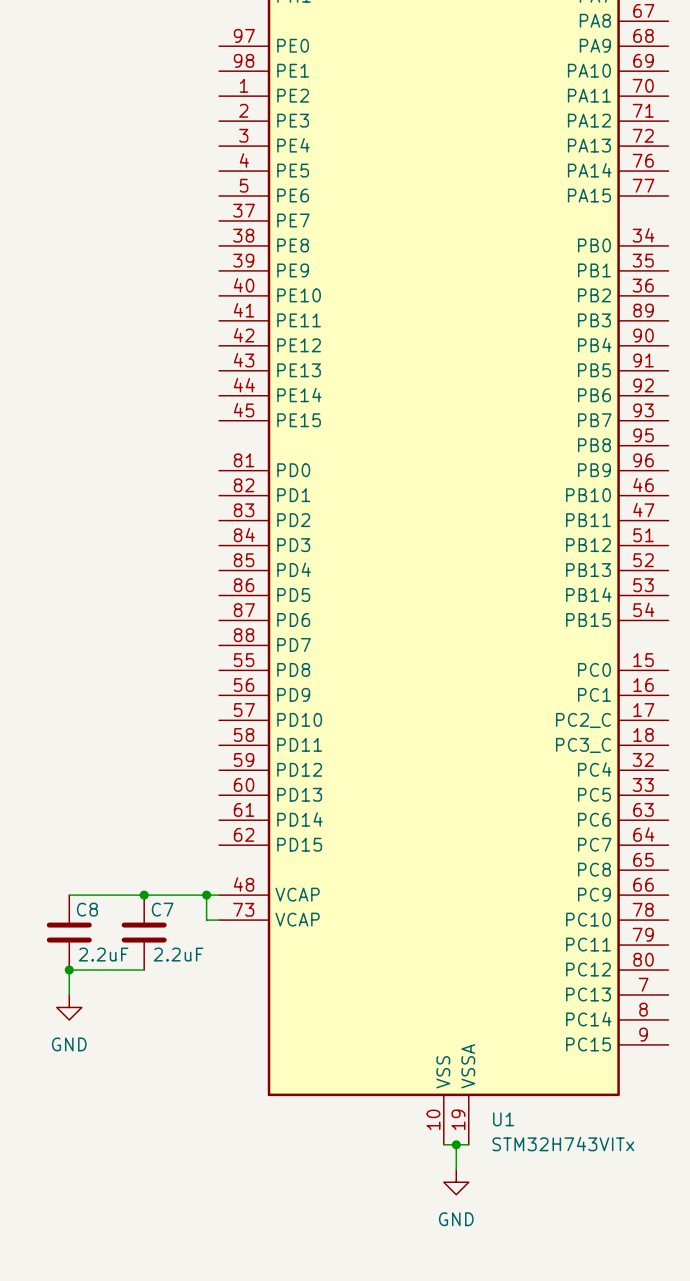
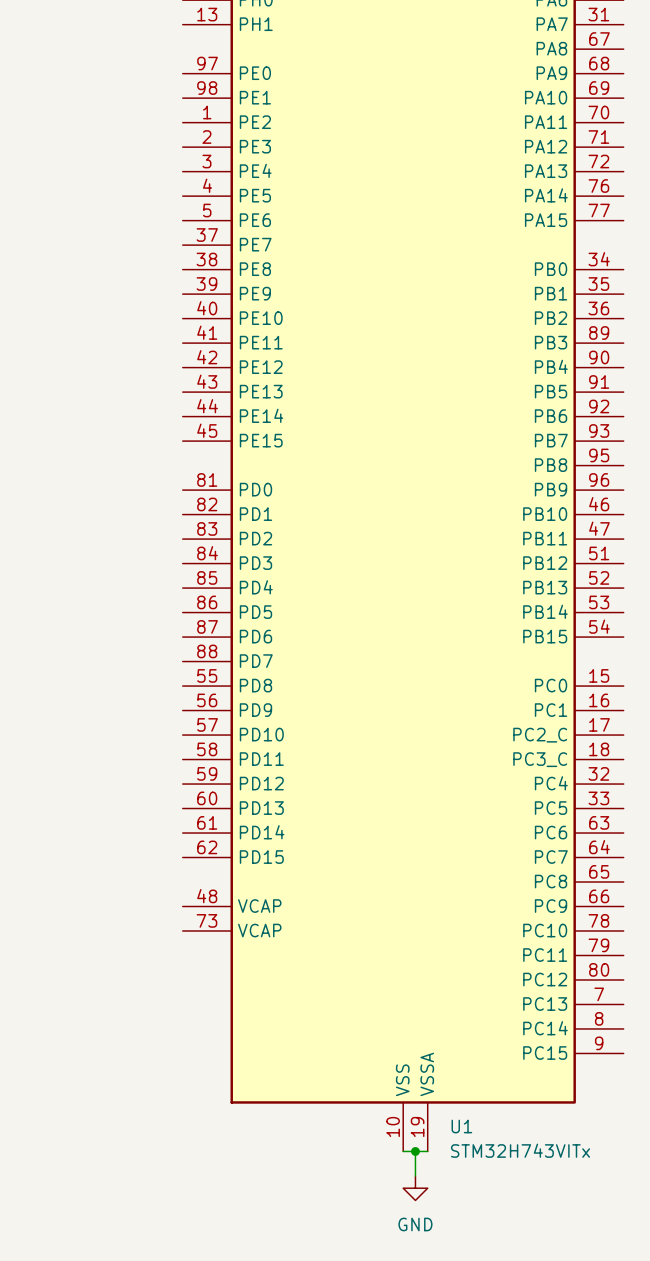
wire: (69, 895) (219, 895) -> none
junction: (144, 895) -> none
wire: (206, 895) (206, 920) (219, 920) -> none
junction: (206, 895) -> none
C8: 2.2uF (69, 932) -> none
C7: 2.2uF (144, 932) -> none
junction: (69, 970) -> none
wire: (144, 970) (69, 970) (69, 994) -> none
power symbol: GND (69, 1007) -> none

